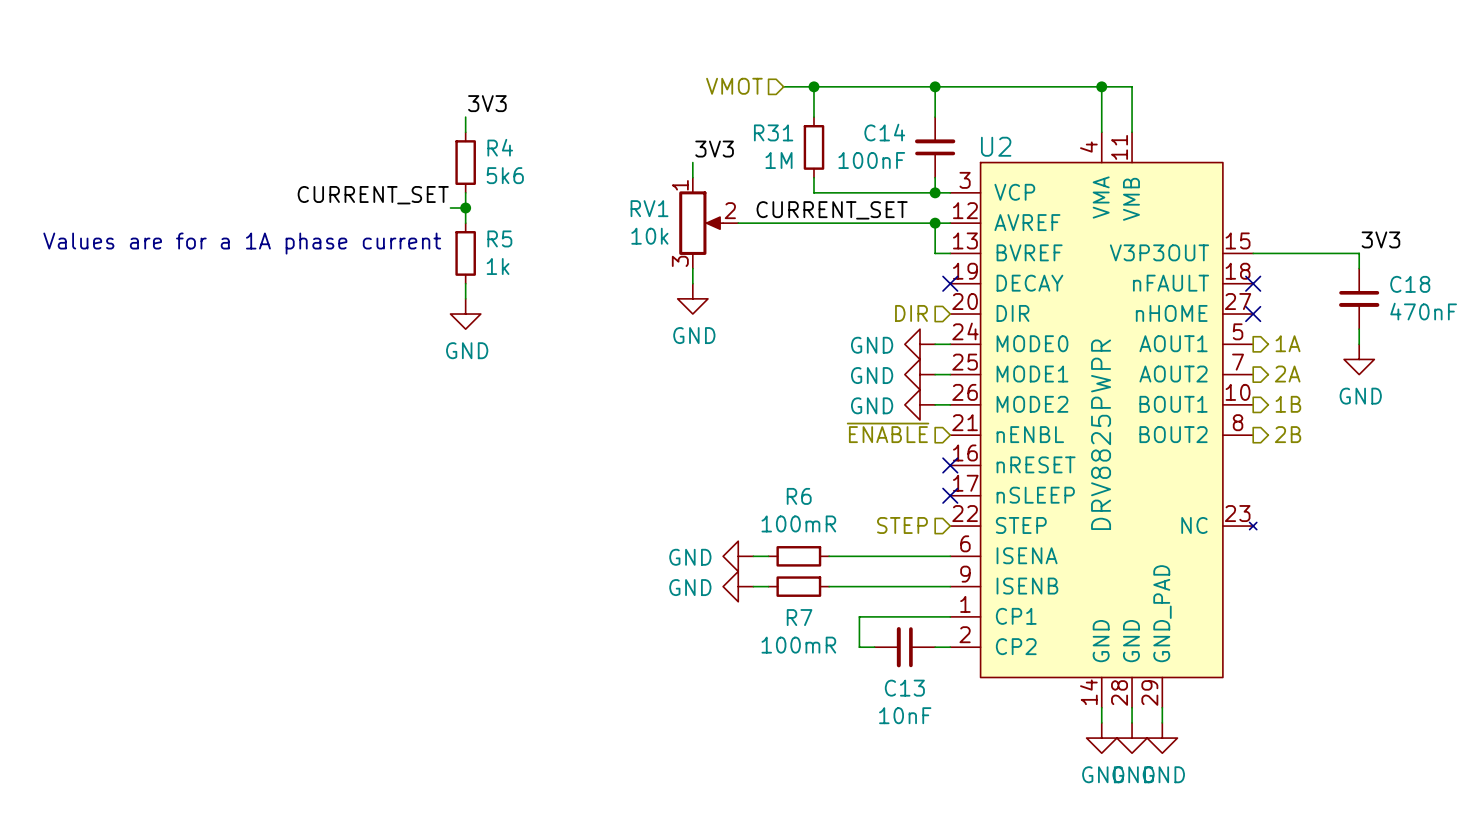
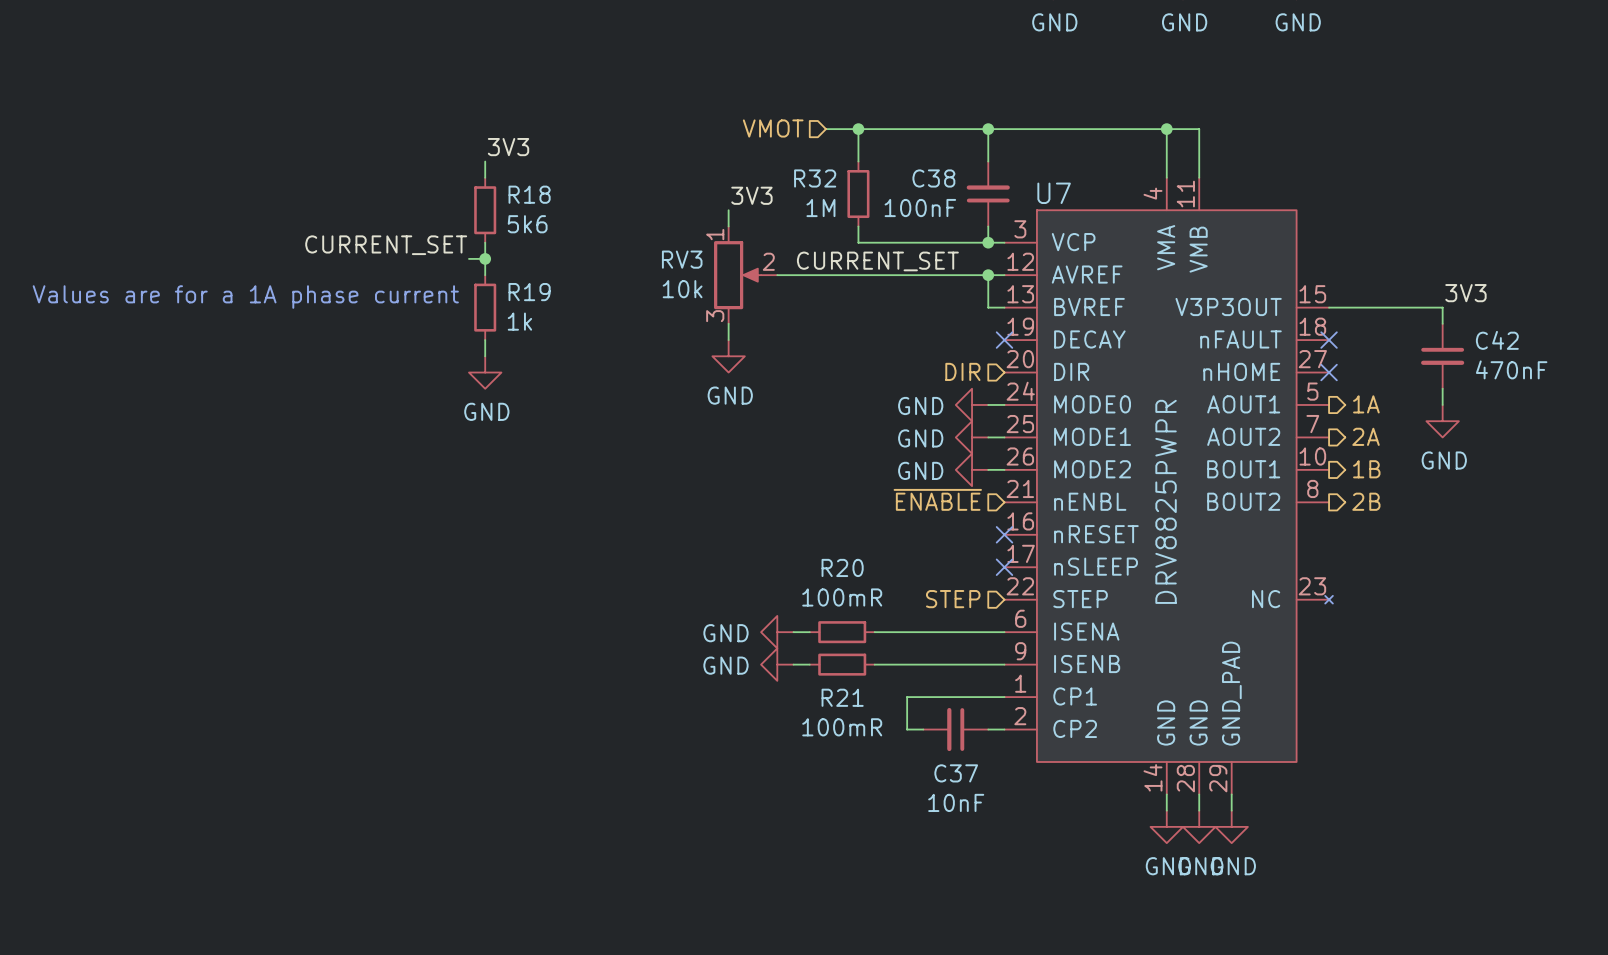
R31 name: R31 (773, 132) -> R32 (815, 178)
C14 name: C14 (884, 132) -> C38 (933, 178)
U2 name: U2 (996, 146) -> U7 (1054, 193)
R4 name: R4 (500, 147) -> R18 (529, 194)
RV1 name: RV1 (649, 208) -> RV3 (682, 259)
R5 name: R5 (499, 238) -> R19 (529, 292)
C18 name: C18 (1410, 284) -> C42 (1497, 340)
R6 name: R6 (799, 496) -> R20 (842, 567)
R7 name: R7 (799, 617) -> R21 (842, 697)
C13 name: C13 (904, 688) -> C37 (956, 773)

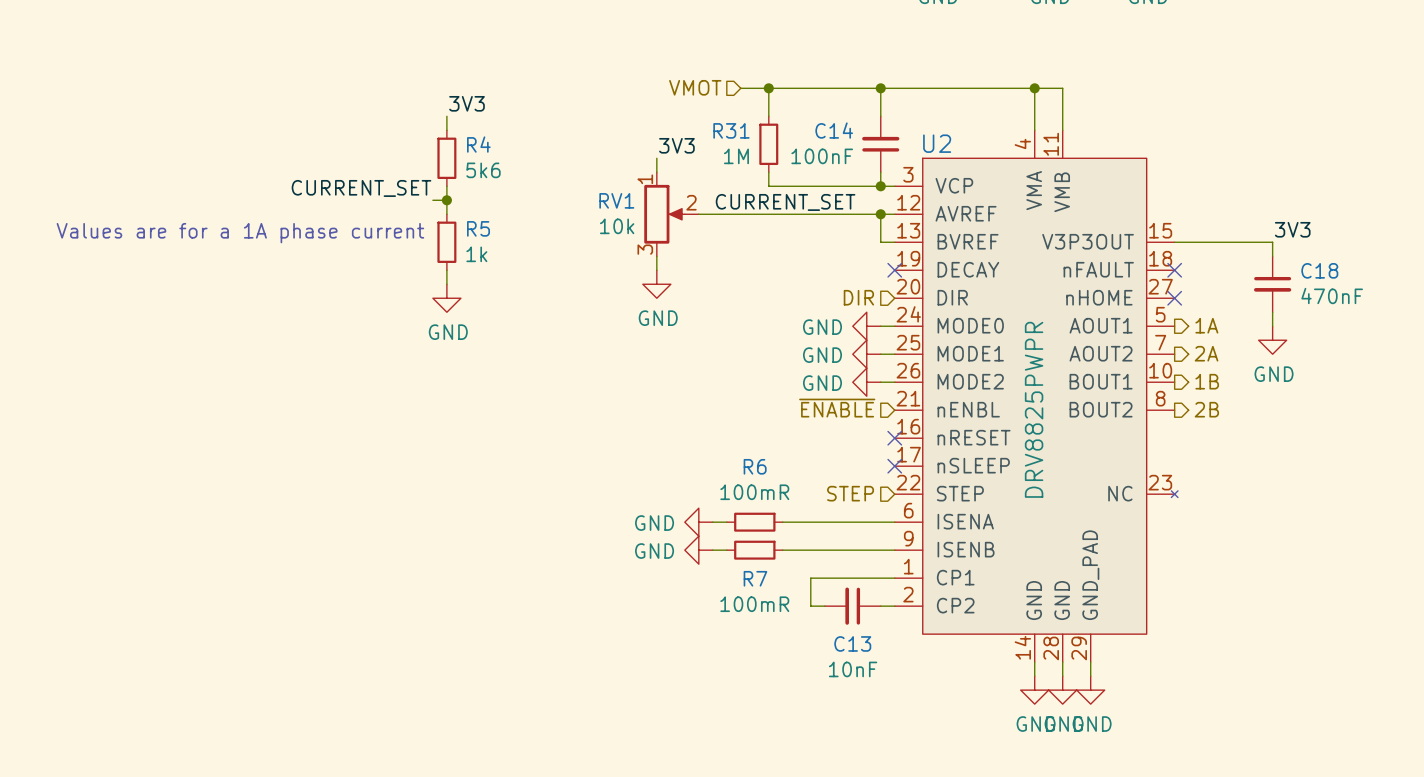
R32 name: R32 (815, 178) -> R31 (731, 130)
C38 name: C38 (933, 178) -> C14 (834, 130)
U7 name: U7 (1054, 193) -> U2 (937, 143)
R18 name: R18 (529, 194) -> R4 (478, 144)
RV3 name: RV3 (682, 259) -> RV1 (616, 200)
R19 name: R19 (529, 292) -> R5 (478, 228)
C42 name: C42 (1497, 340) -> C18 (1319, 270)
R20 name: R20 (842, 567) -> R6 (755, 466)
R21 name: R21 (842, 697) -> R7 (755, 578)
C37 name: C37 (956, 773) -> C13 (852, 643)

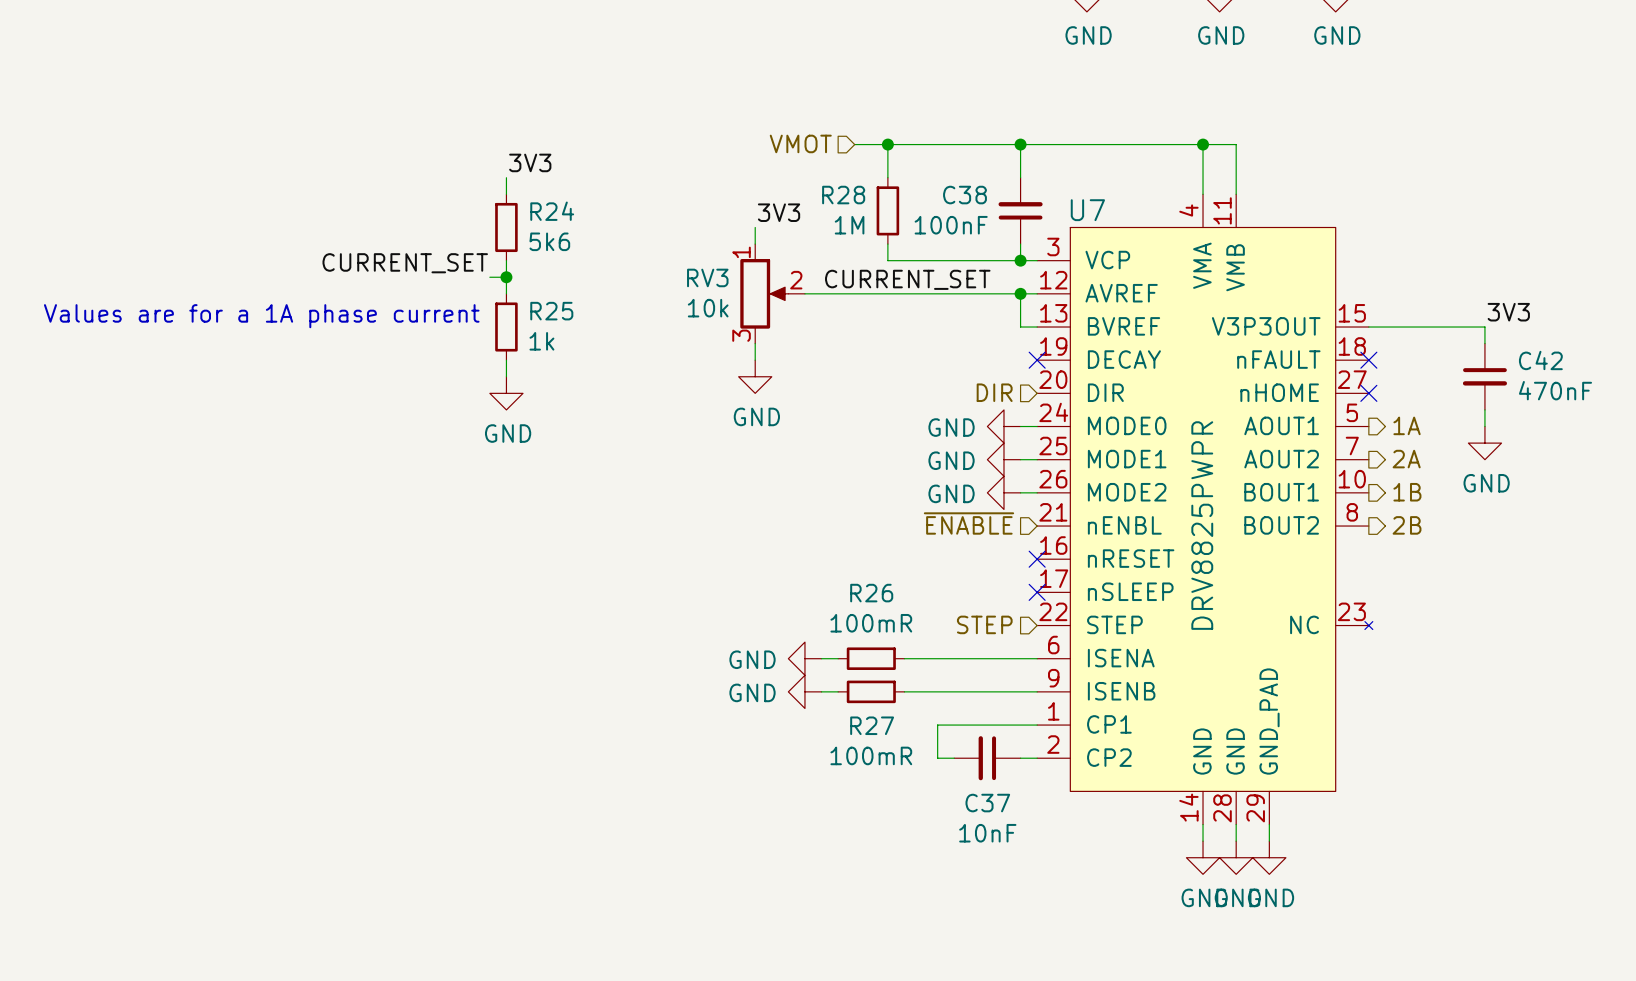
R31 name: R31 (731, 130) -> R28 (843, 195)
C14 name: C14 (834, 130) -> C38 (964, 195)
U2 name: U2 (937, 143) -> U7 (1087, 210)
R4 name: R4 (478, 144) -> R24 (552, 211)
RV1 name: RV1 (616, 200) -> RV3 (707, 277)
R5 name: R5 (478, 228) -> R25 (551, 311)
C18 name: C18 (1319, 270) -> C42 (1540, 360)
R6 name: R6 (755, 466) -> R26 (871, 593)
R7 name: R7 (755, 578) -> R27 (872, 725)
C13 name: C13 (852, 643) -> C37 (987, 803)

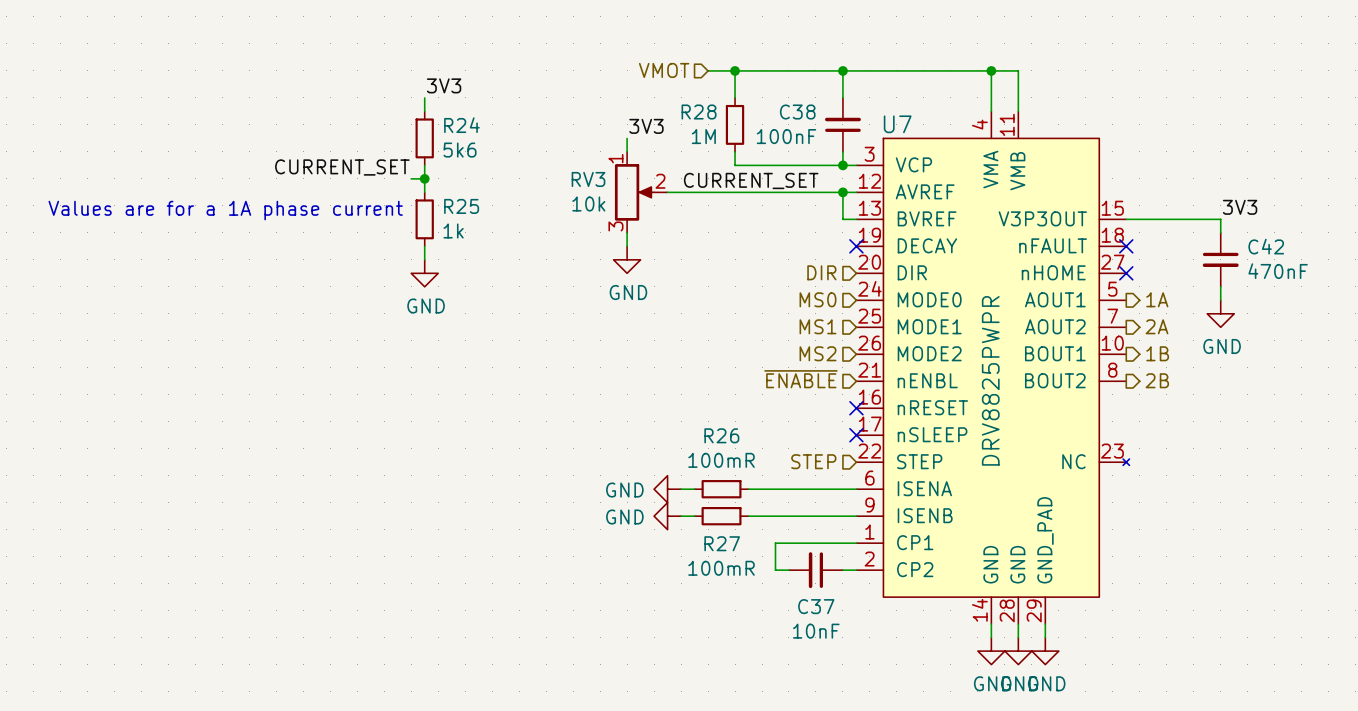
hierarchical label: none -> MS0 (818, 299)
power symbol: GND (1003, 426) -> none
wire: (1020, 426) (1037, 426) -> none
hierarchical label: none -> MS1 (818, 326)
power symbol: GND (1003, 459) -> none
wire: (1020, 459) (1037, 459) -> none
hierarchical label: none -> MS2 (818, 353)
power symbol: GND (1003, 492) -> none
wire: (1020, 492) (1037, 492) -> none

